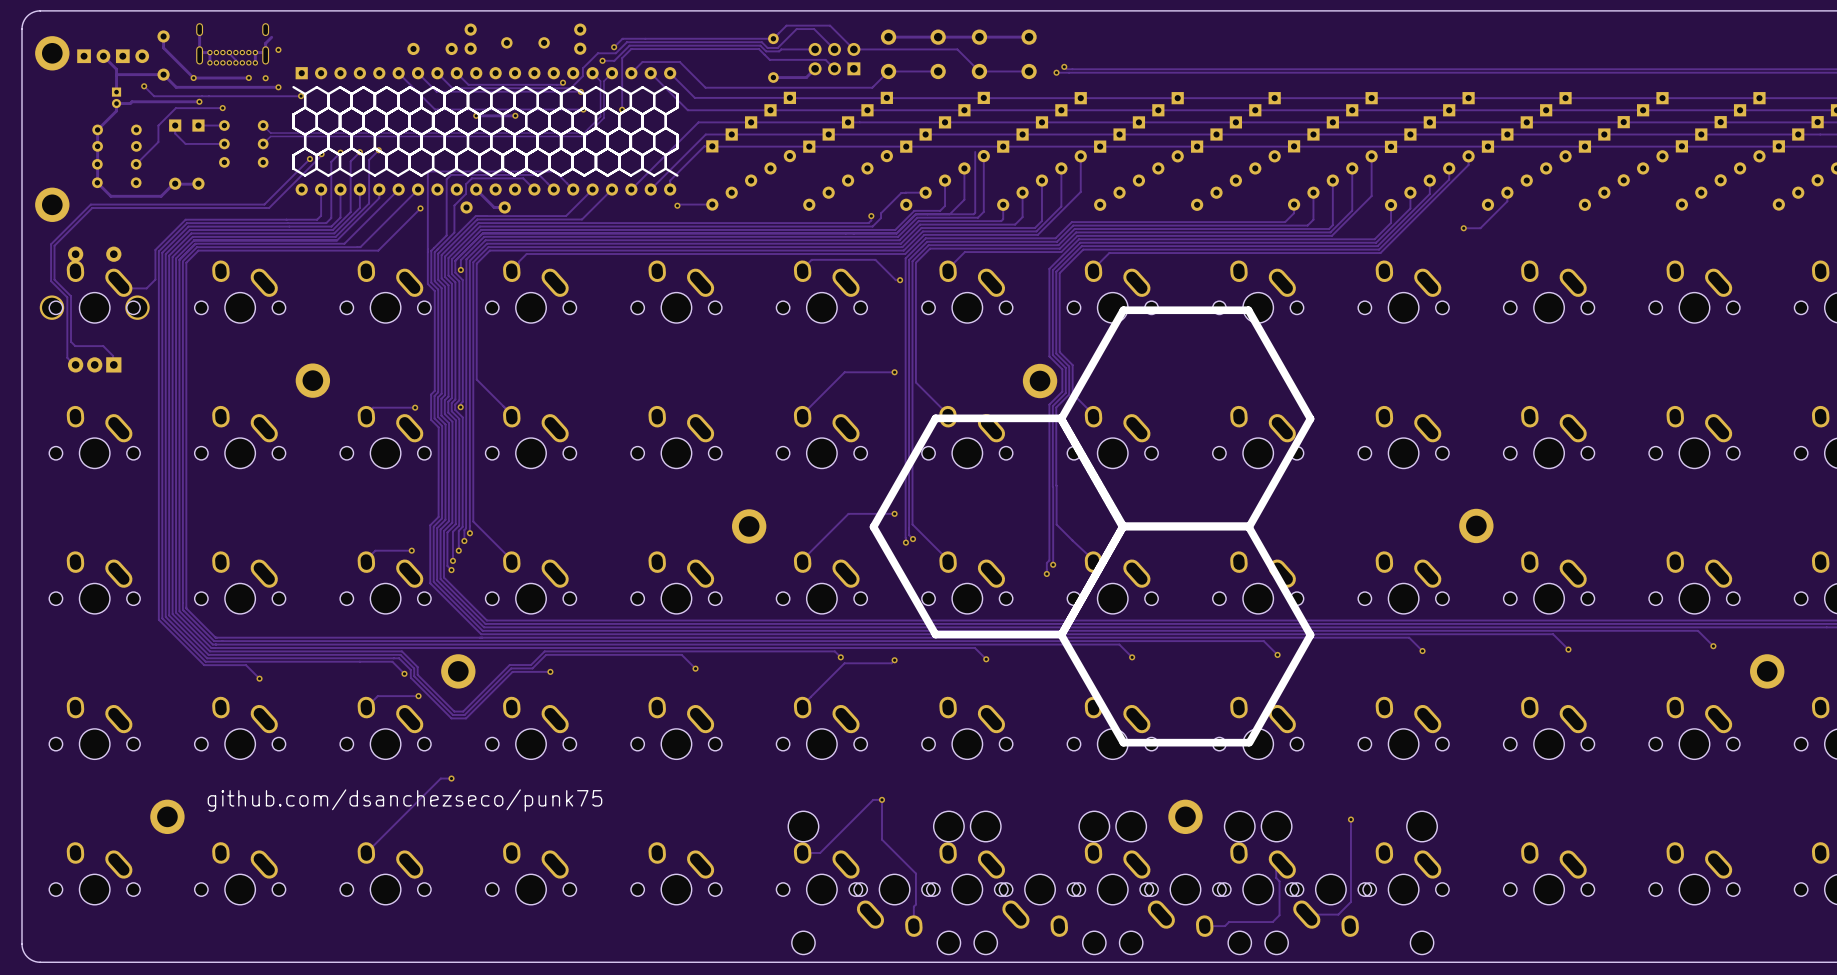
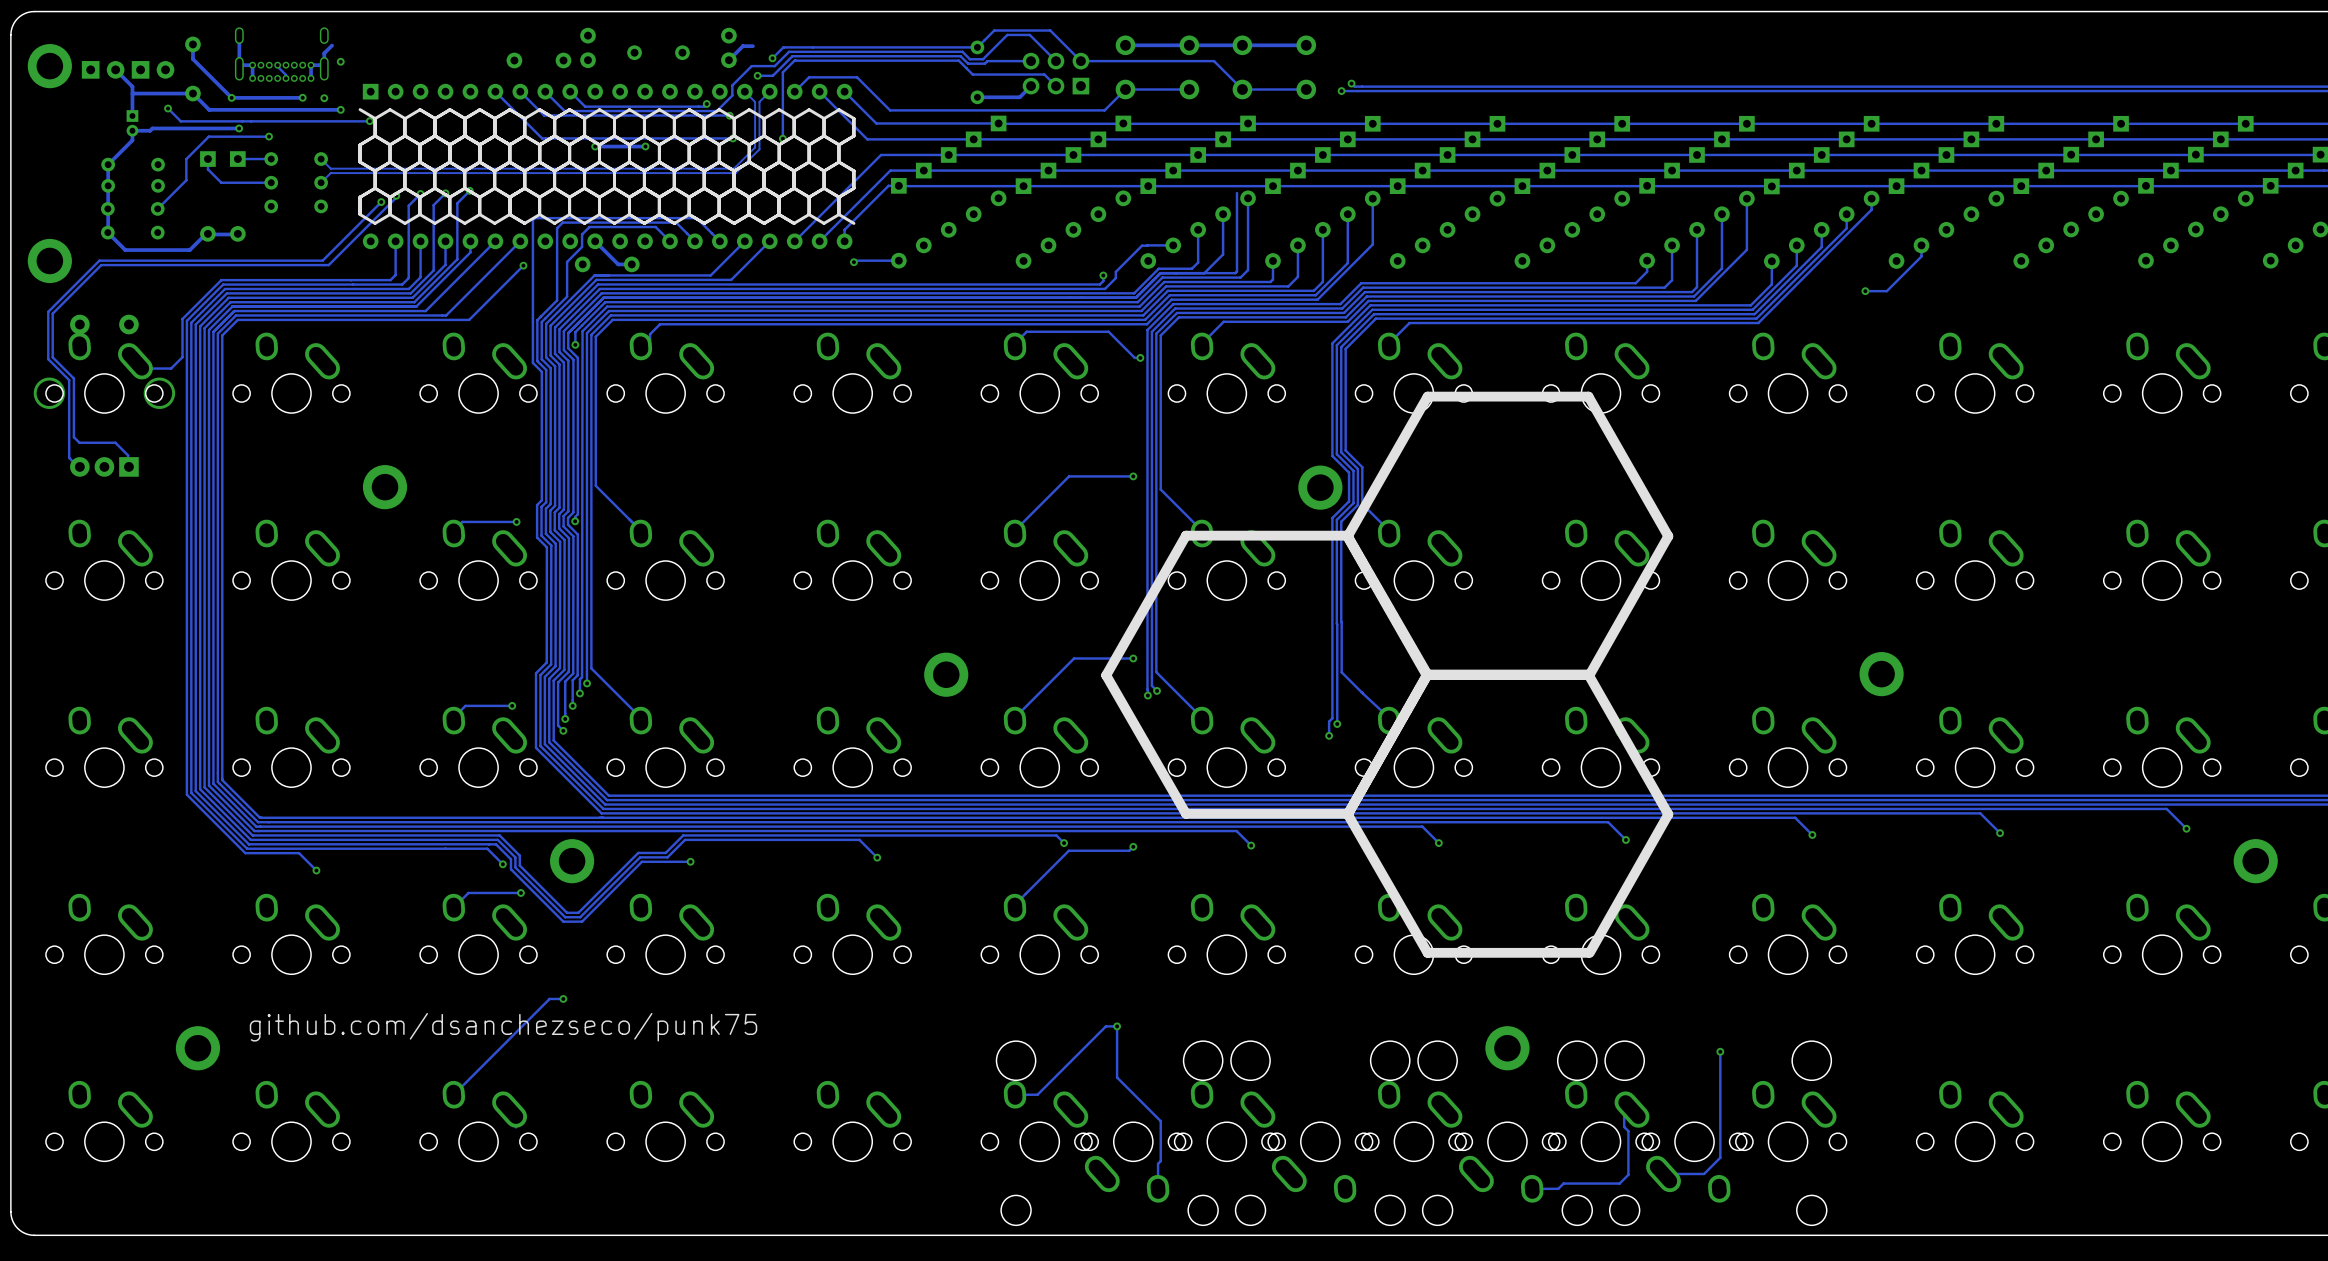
track: none -> (752, 46) (742, 46) (728, 60)

